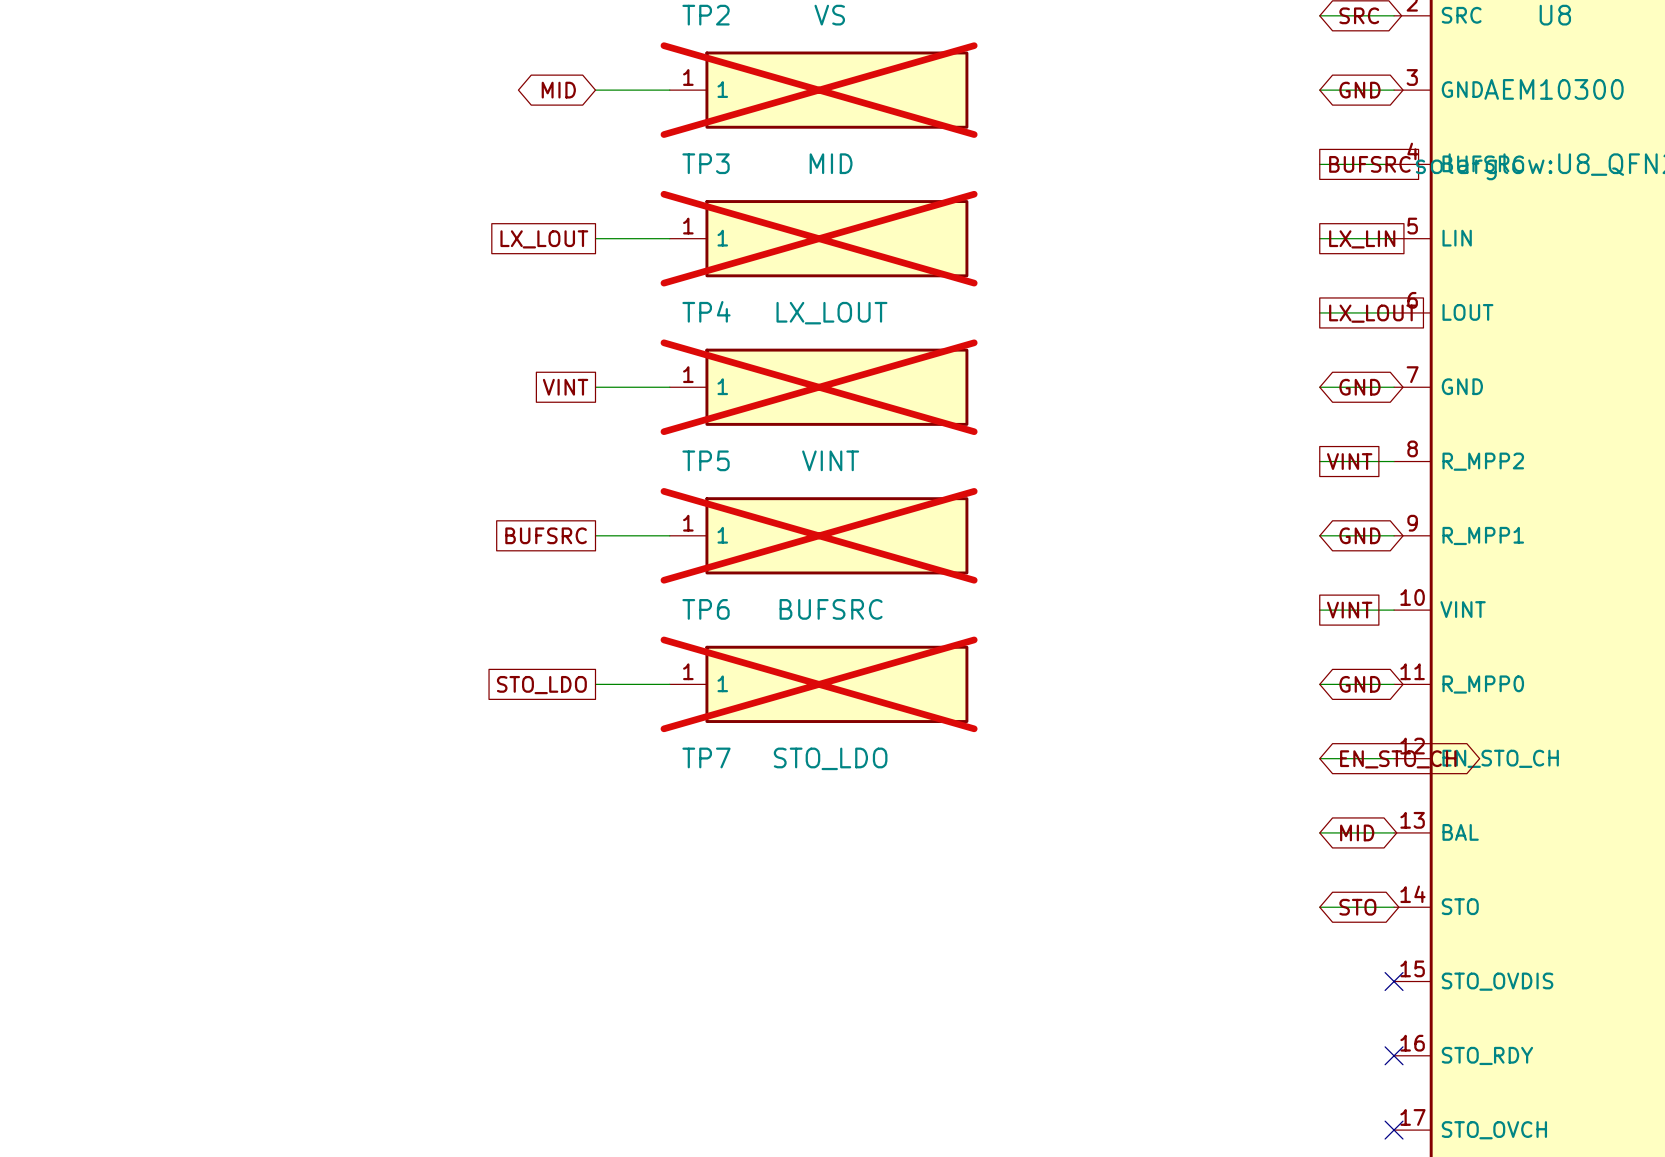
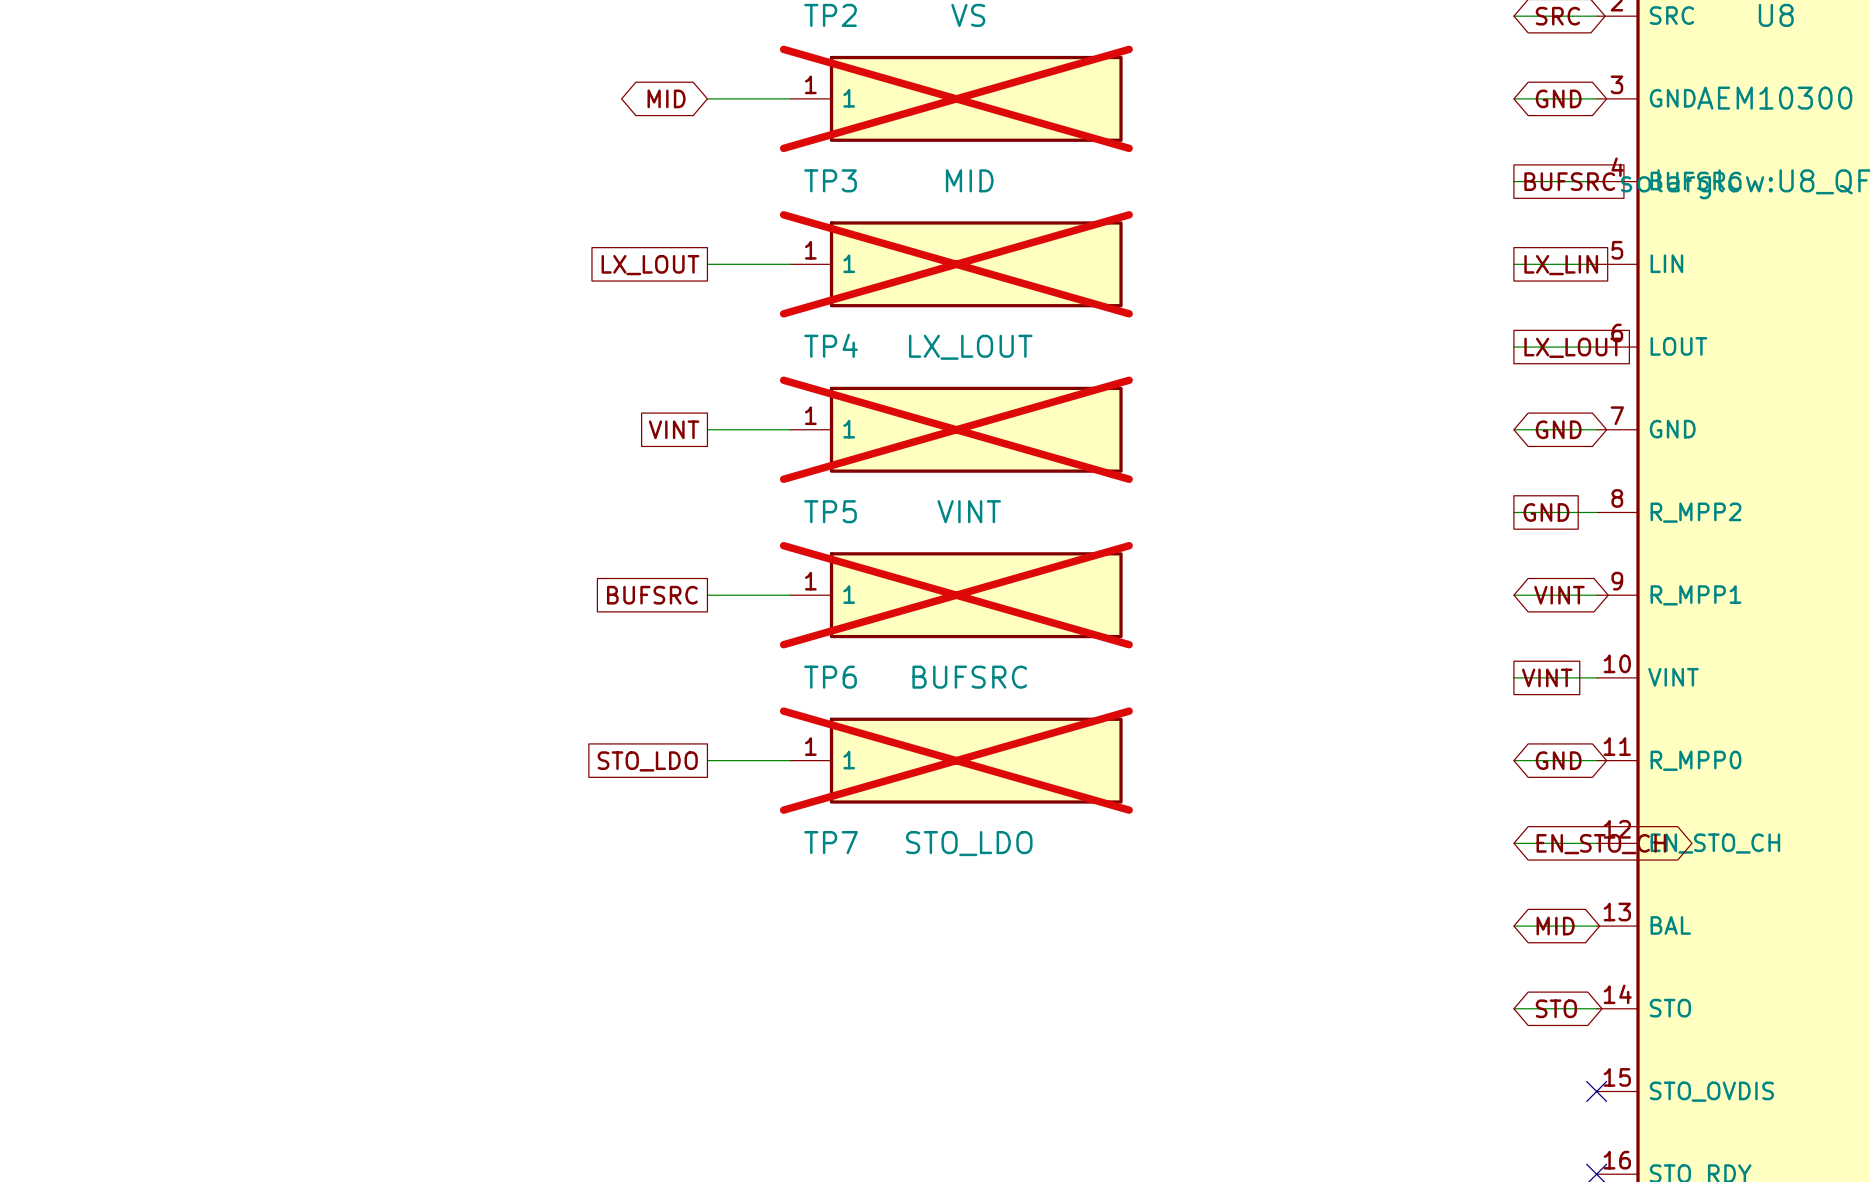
global label: VINT (1349, 461) -> GND (1546, 512)
global label: GND (1359, 535) -> VINT (1559, 595)

